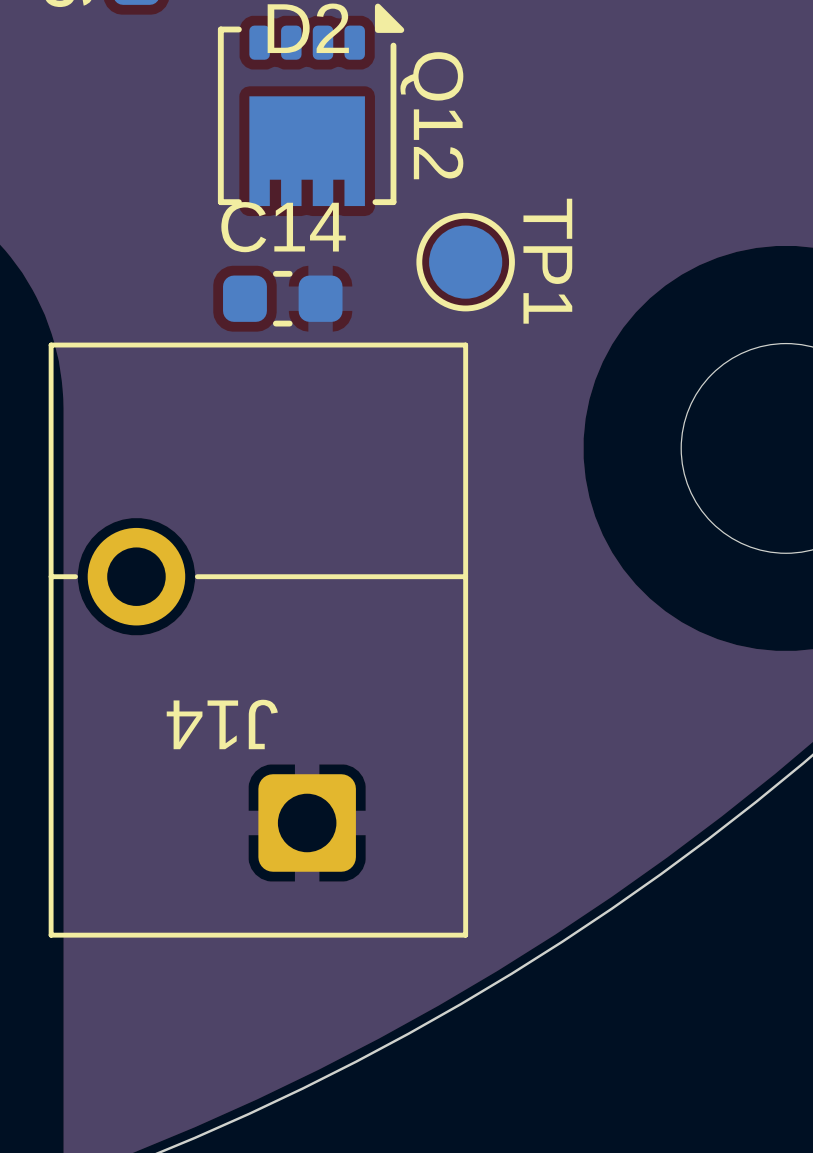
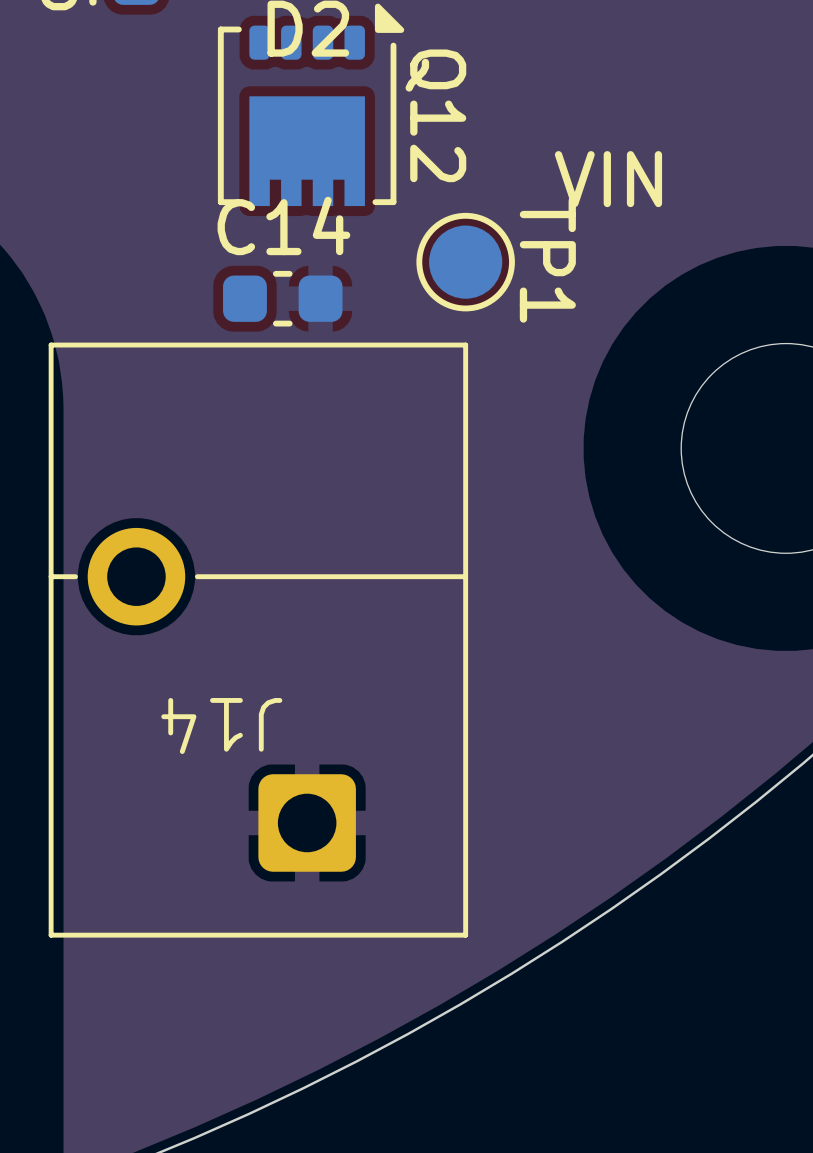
text: none -> VIN (608, 179)

